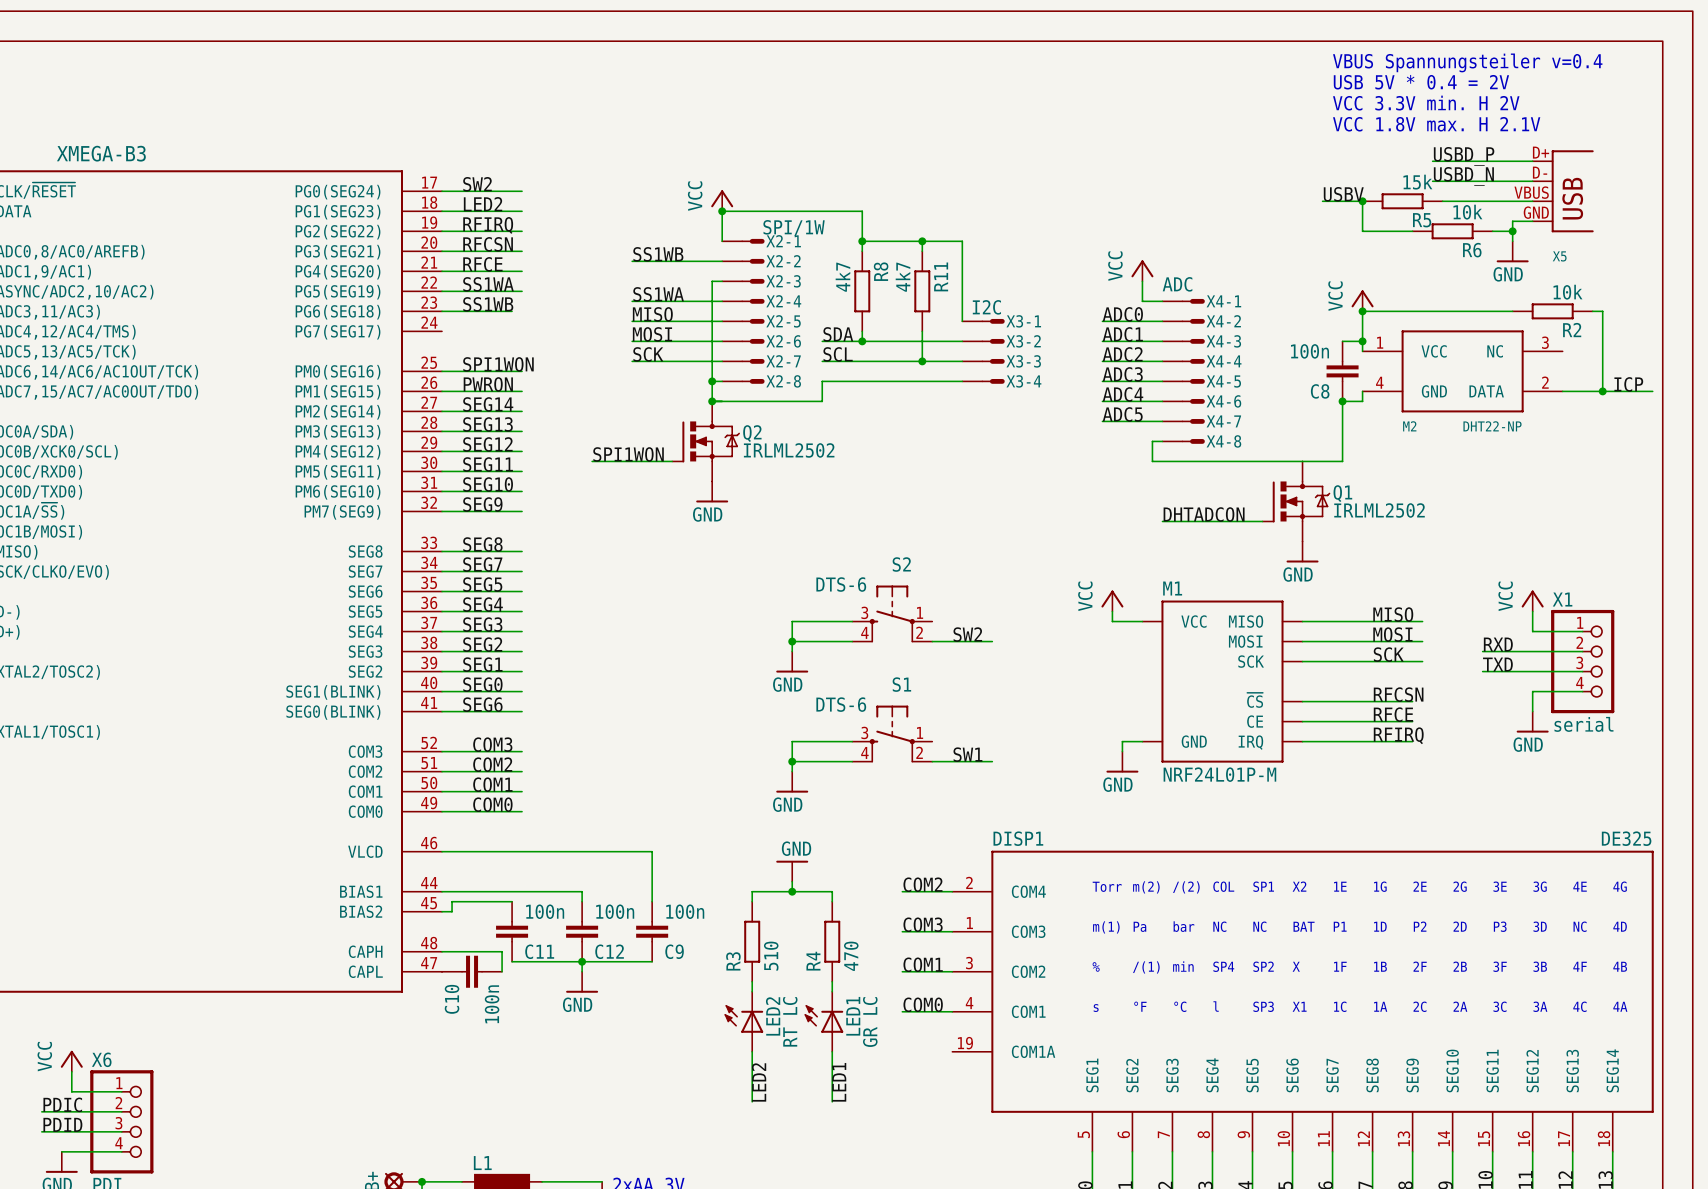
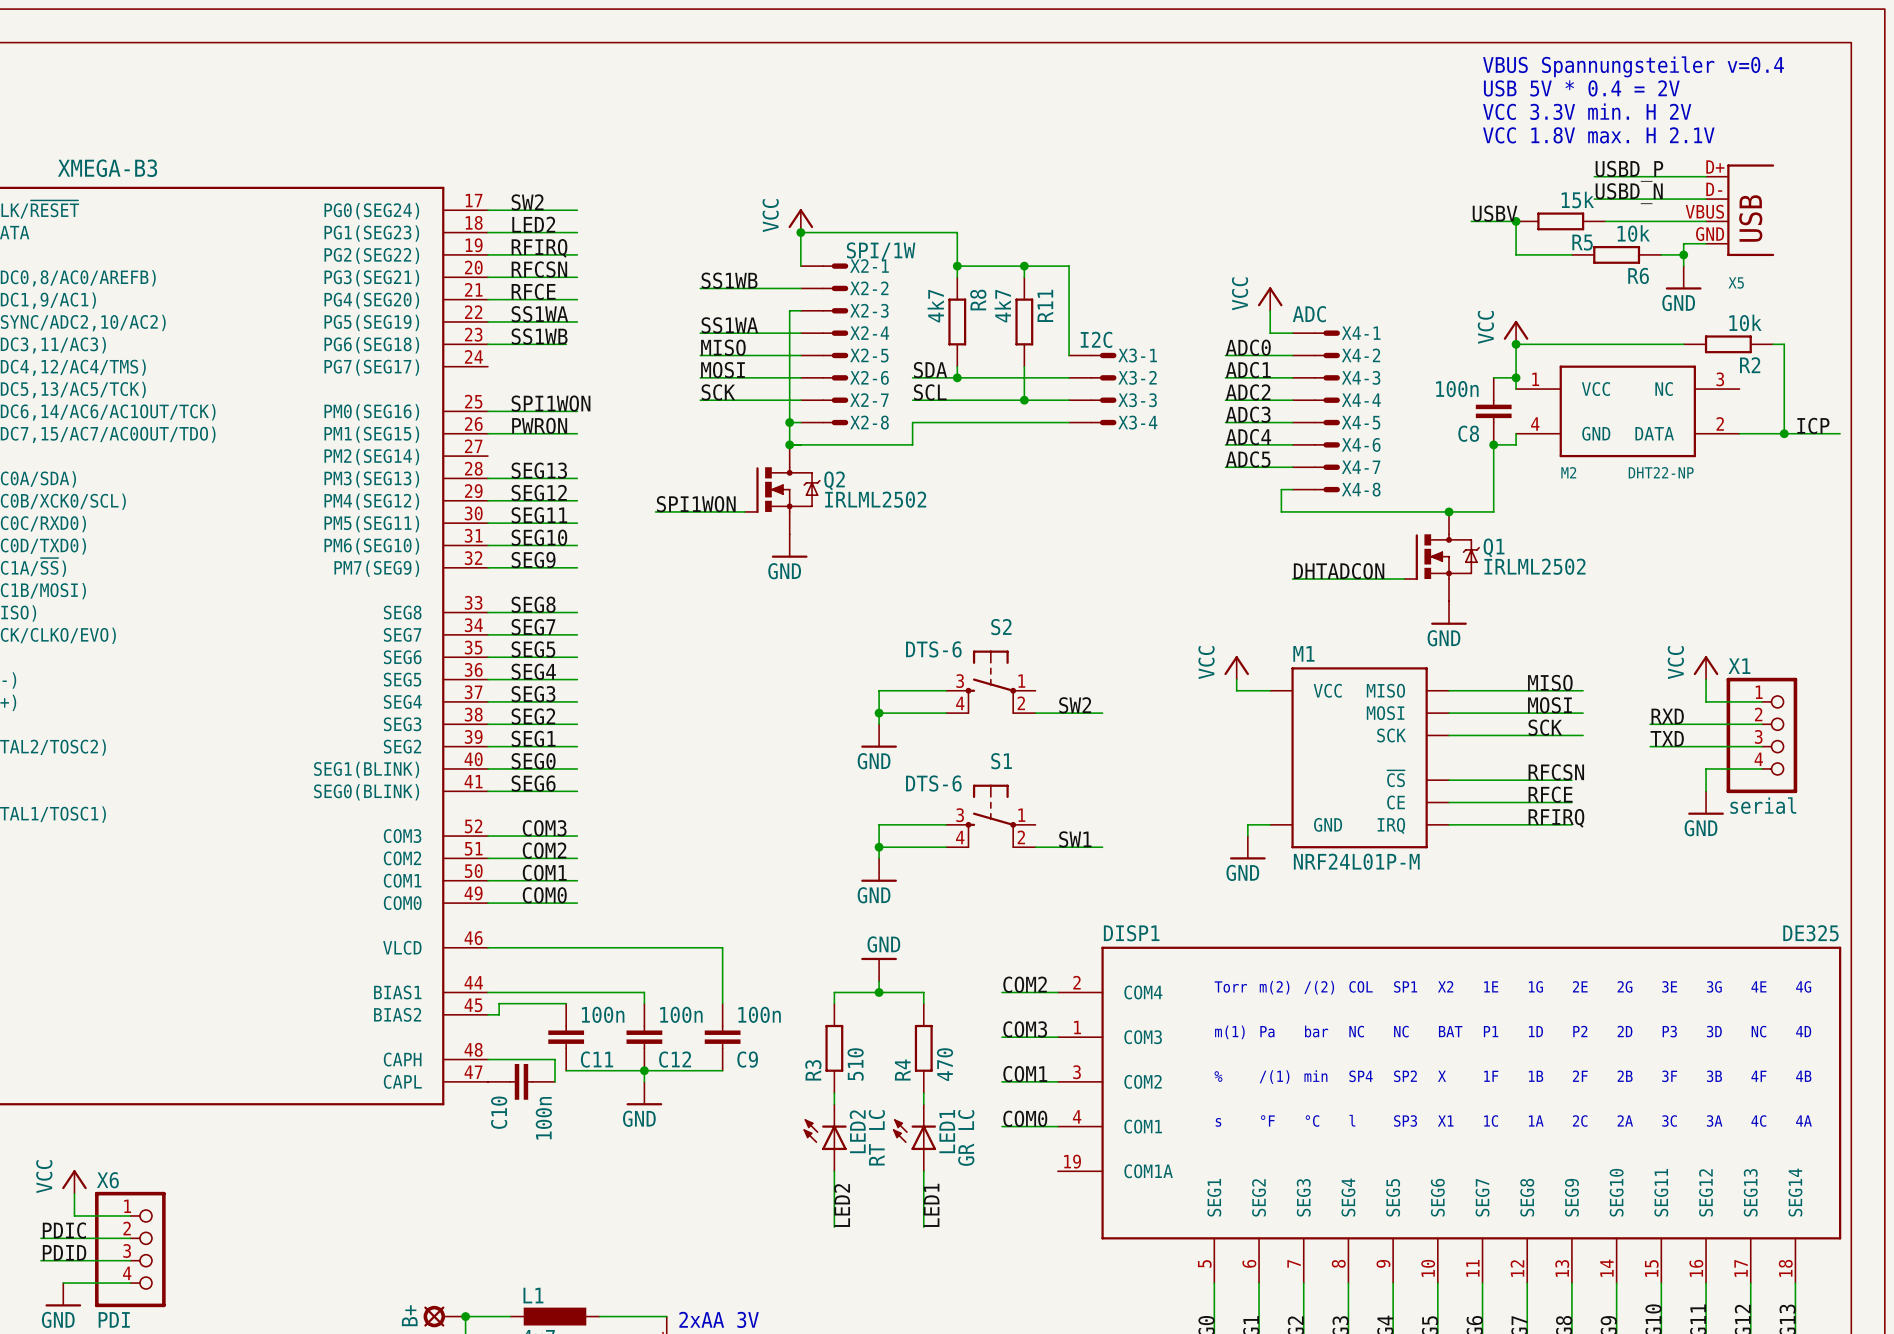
label: SEG14 (488, 404) -> none
wire: (442, 411) (522, 411) -> none
junction: none -> (1449, 511)

